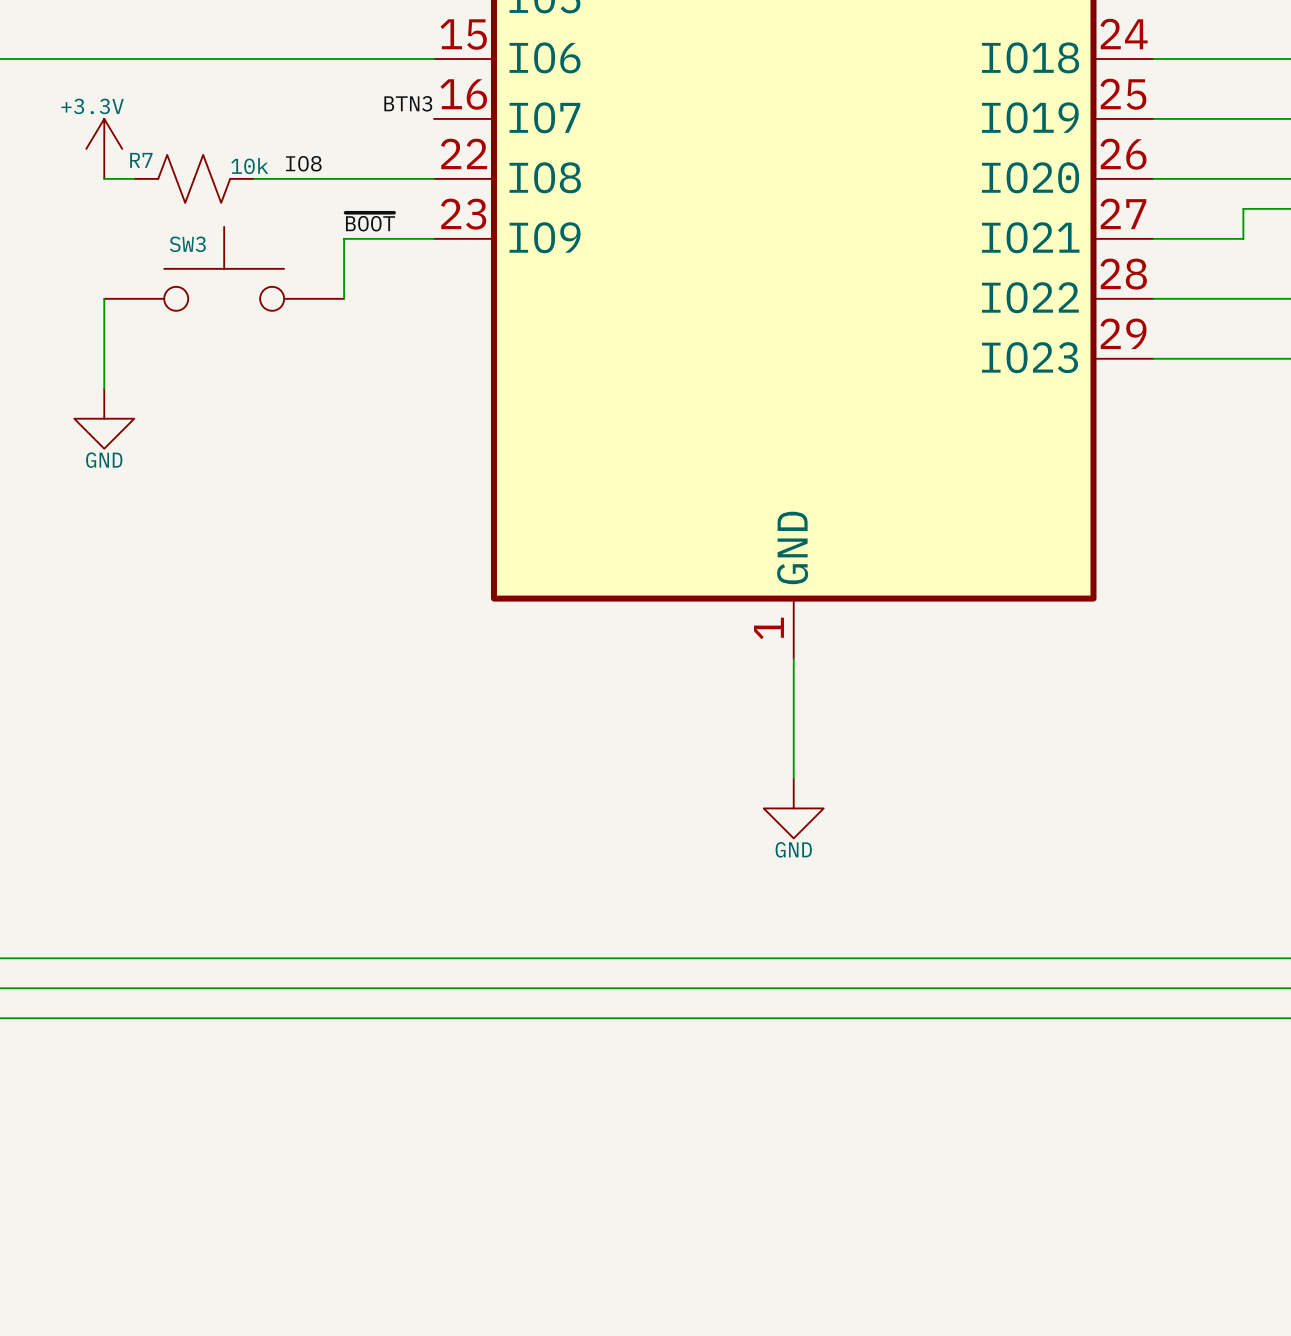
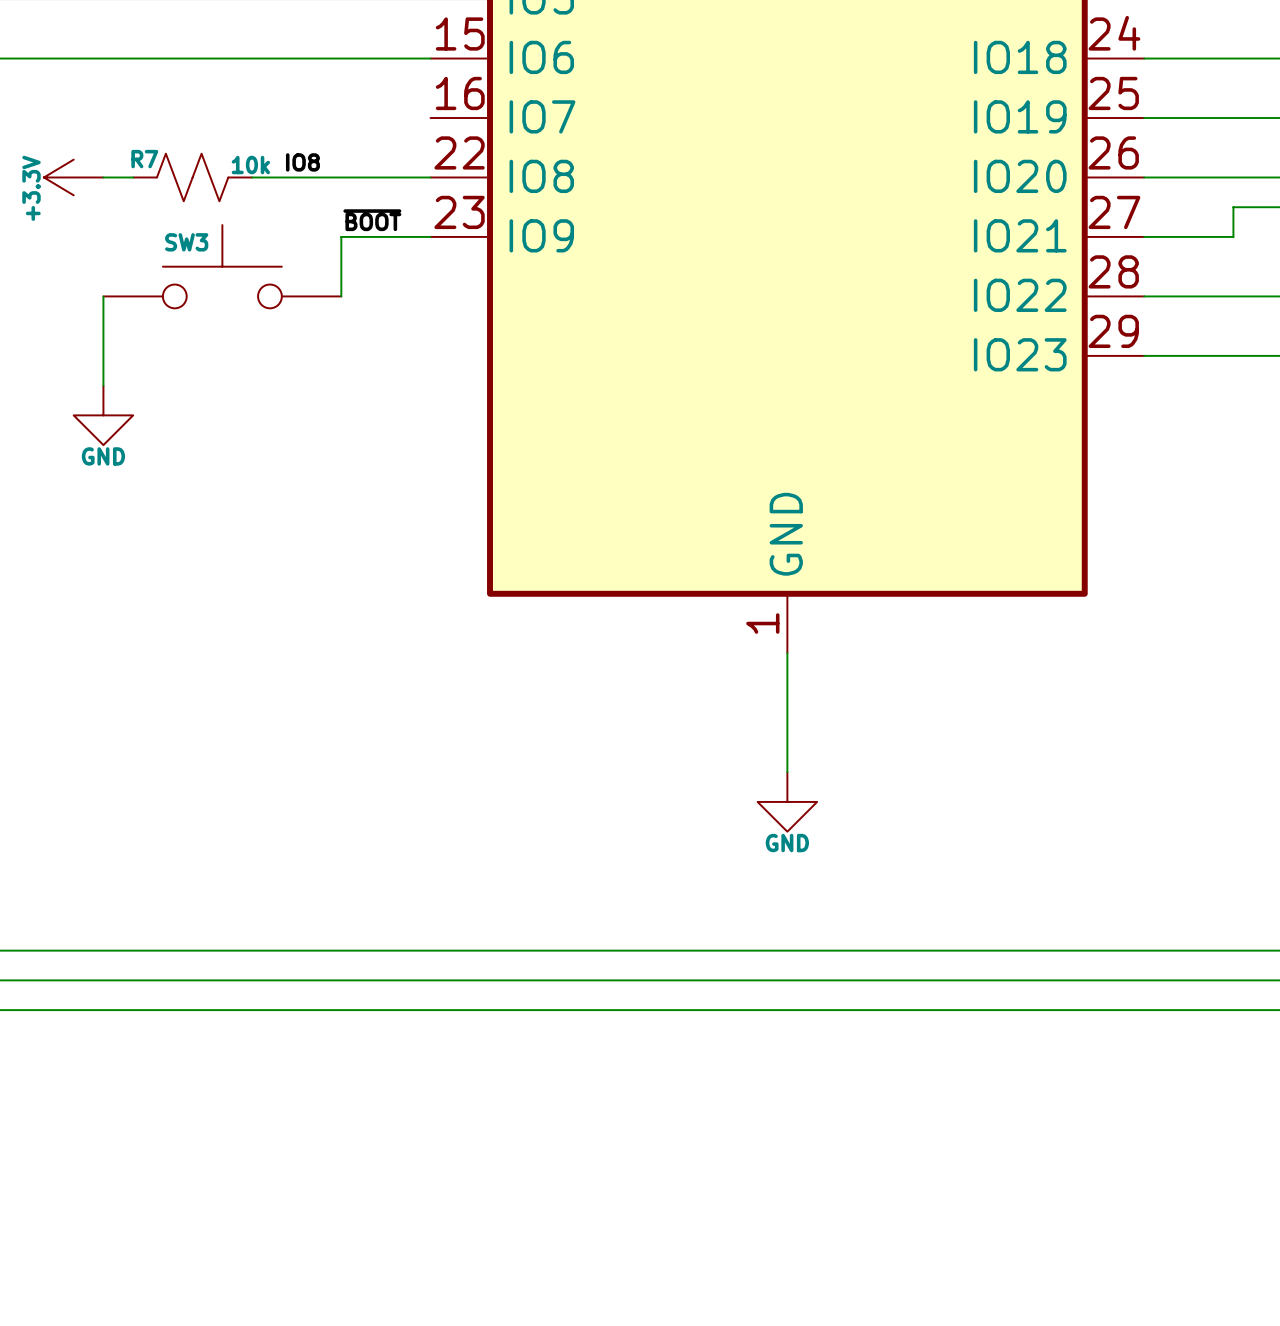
label: BTN3 (408, 103) -> none
power symbol rotation: 0° (104, 148) -> 90° counterclockwise (73, 177)
power symbol position: +3.3V (104, 148) -> +3.3V (73, 177)

